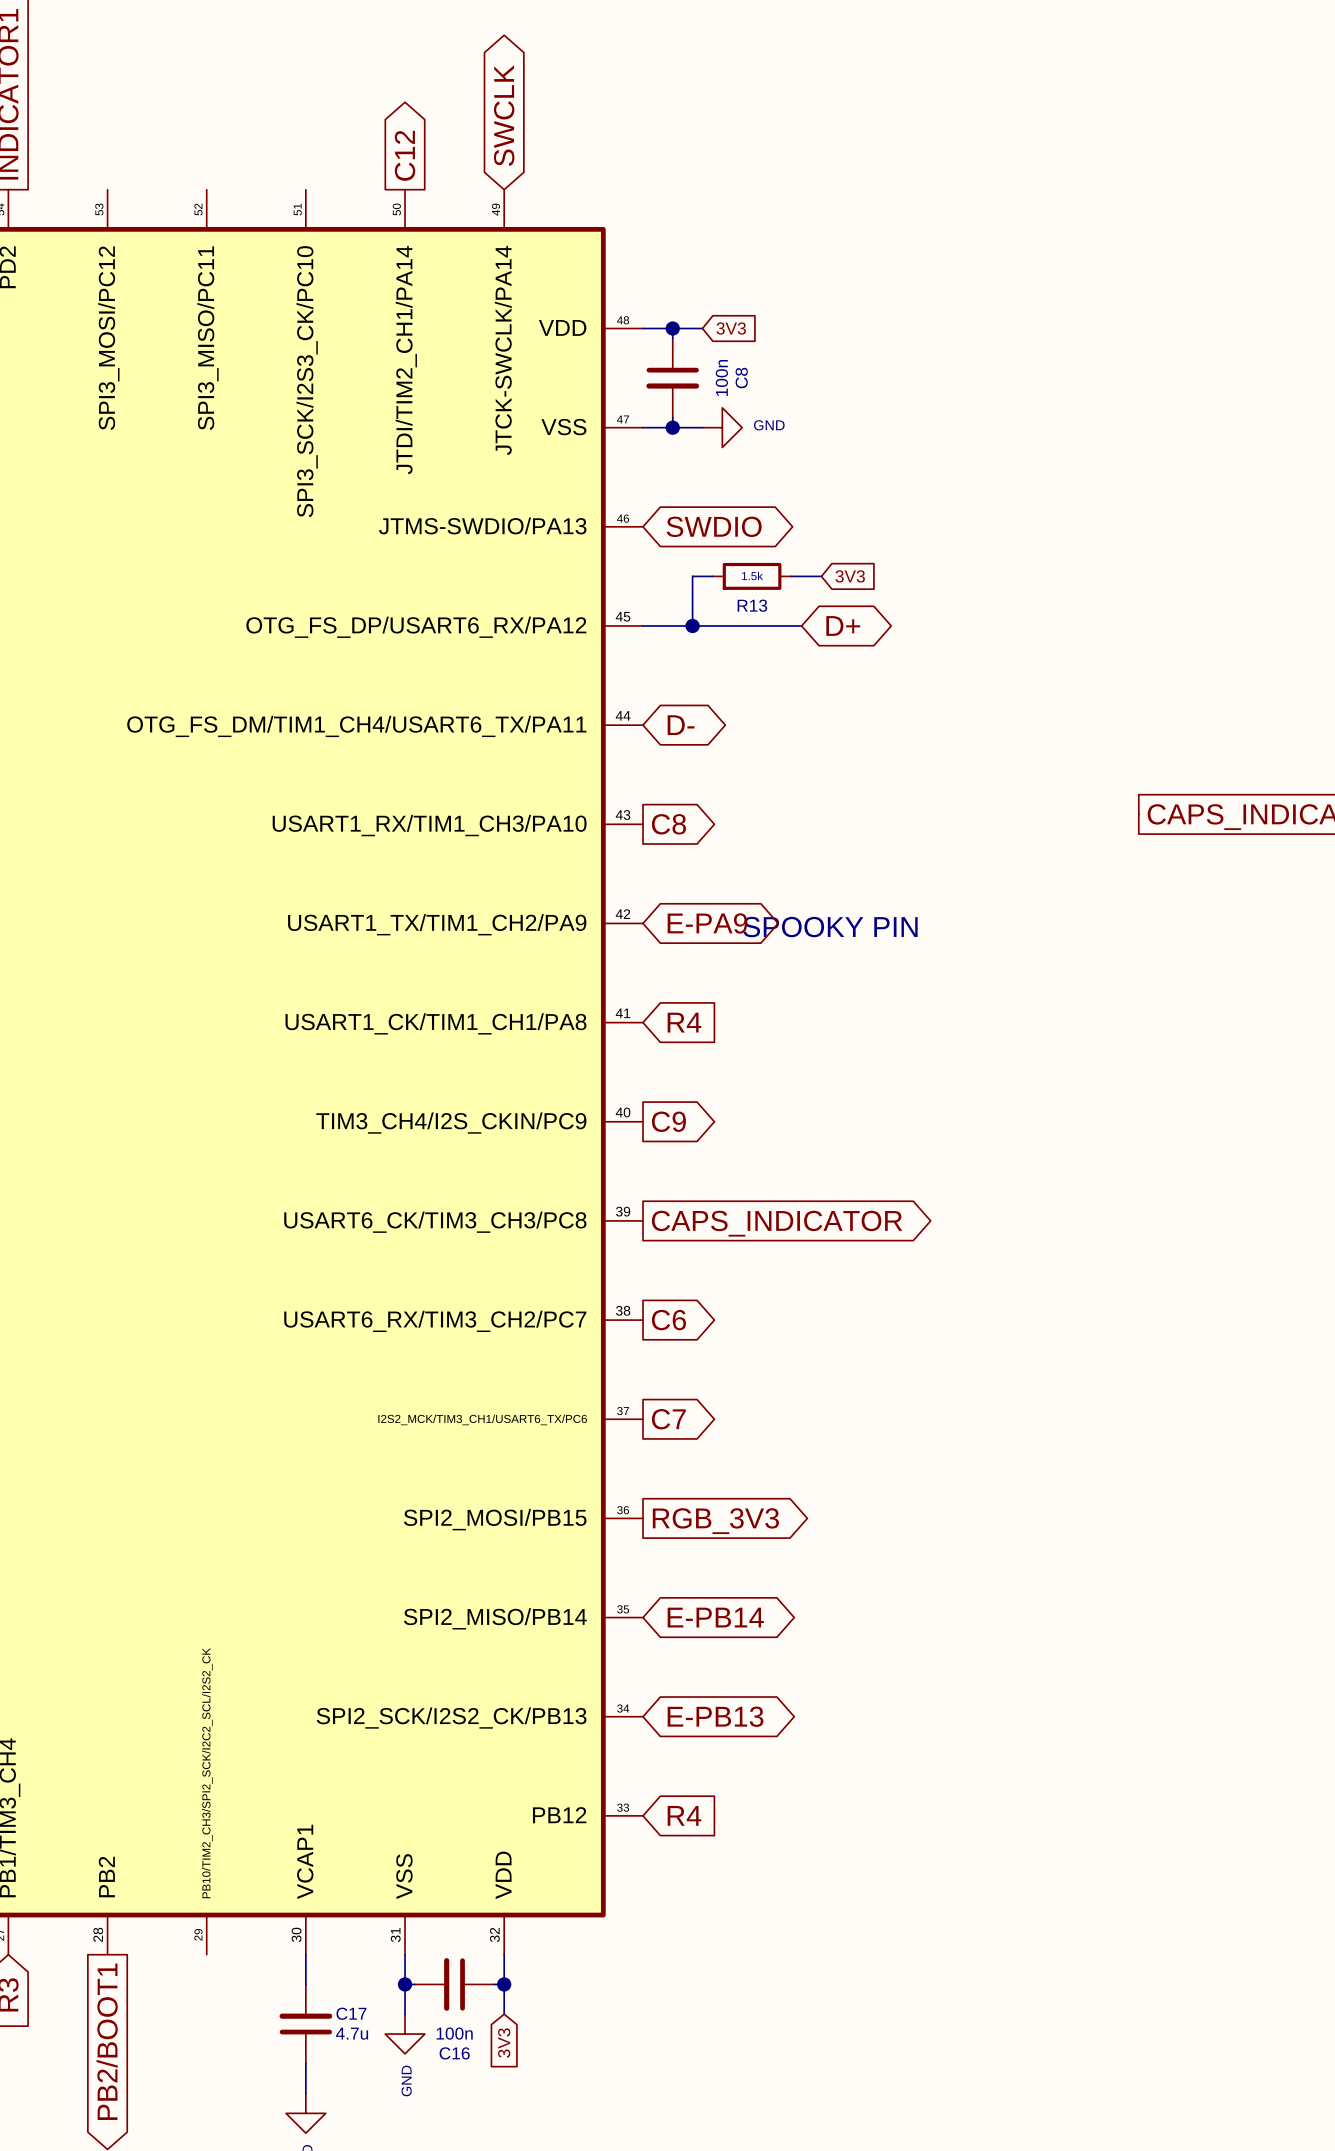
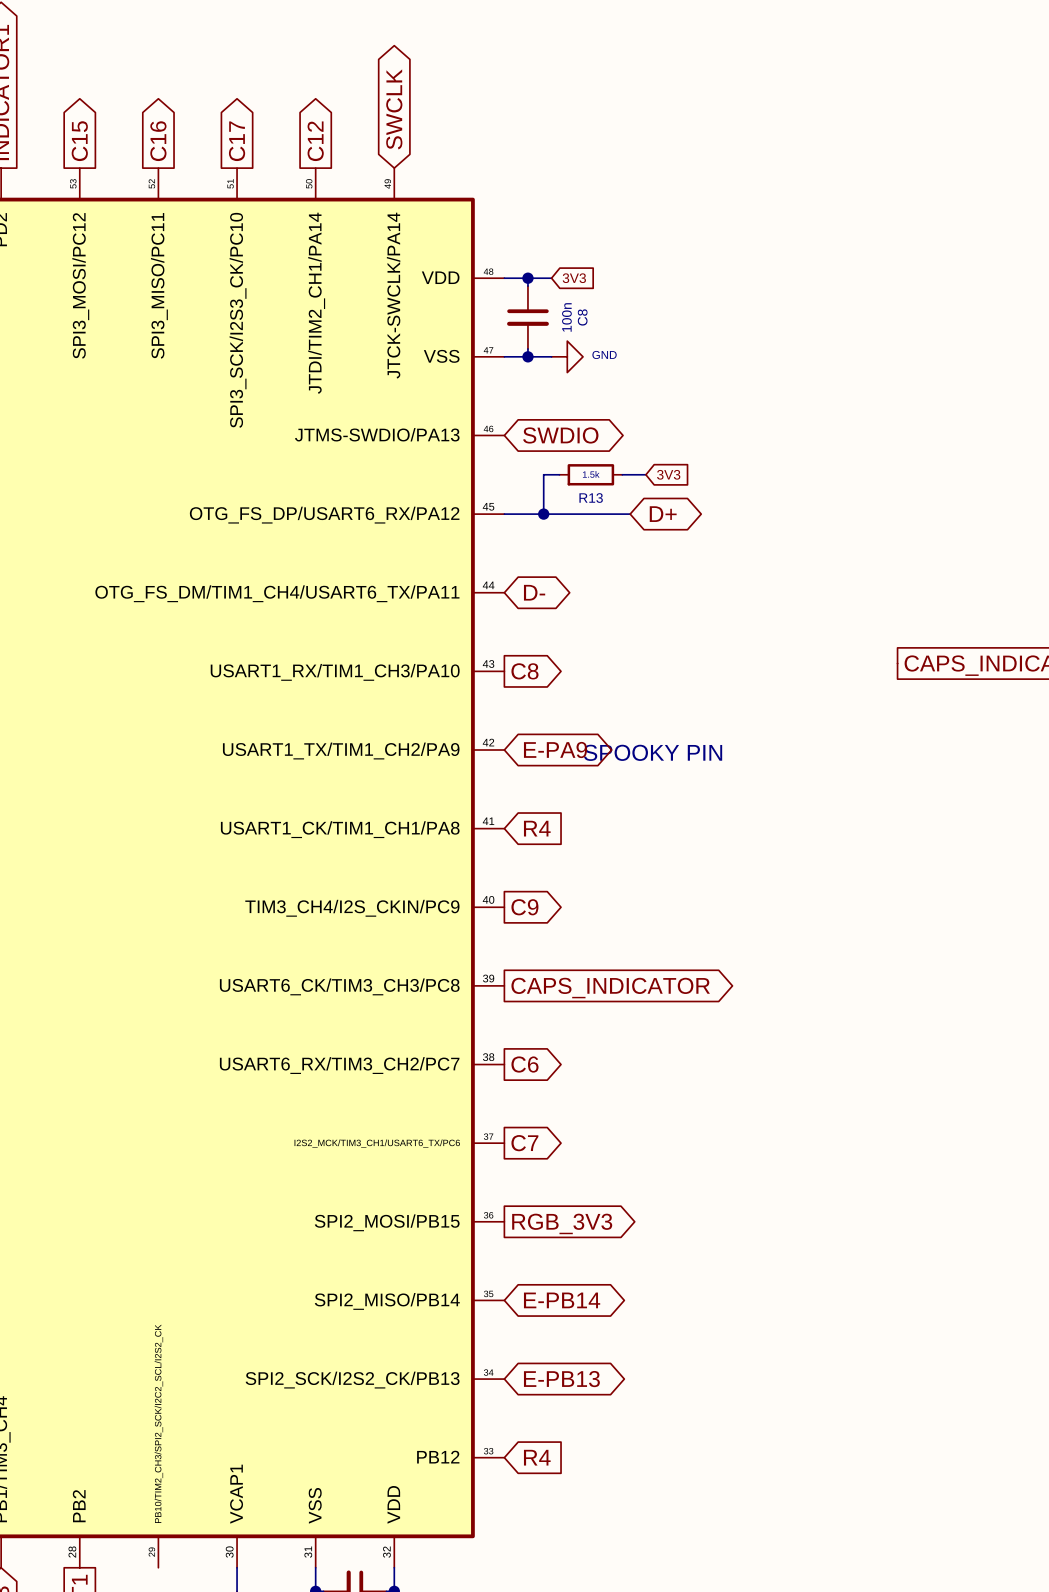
global label: none -> C15 (79, 141)
global label: none -> C16 (158, 141)
global label: none -> C17 (237, 141)

